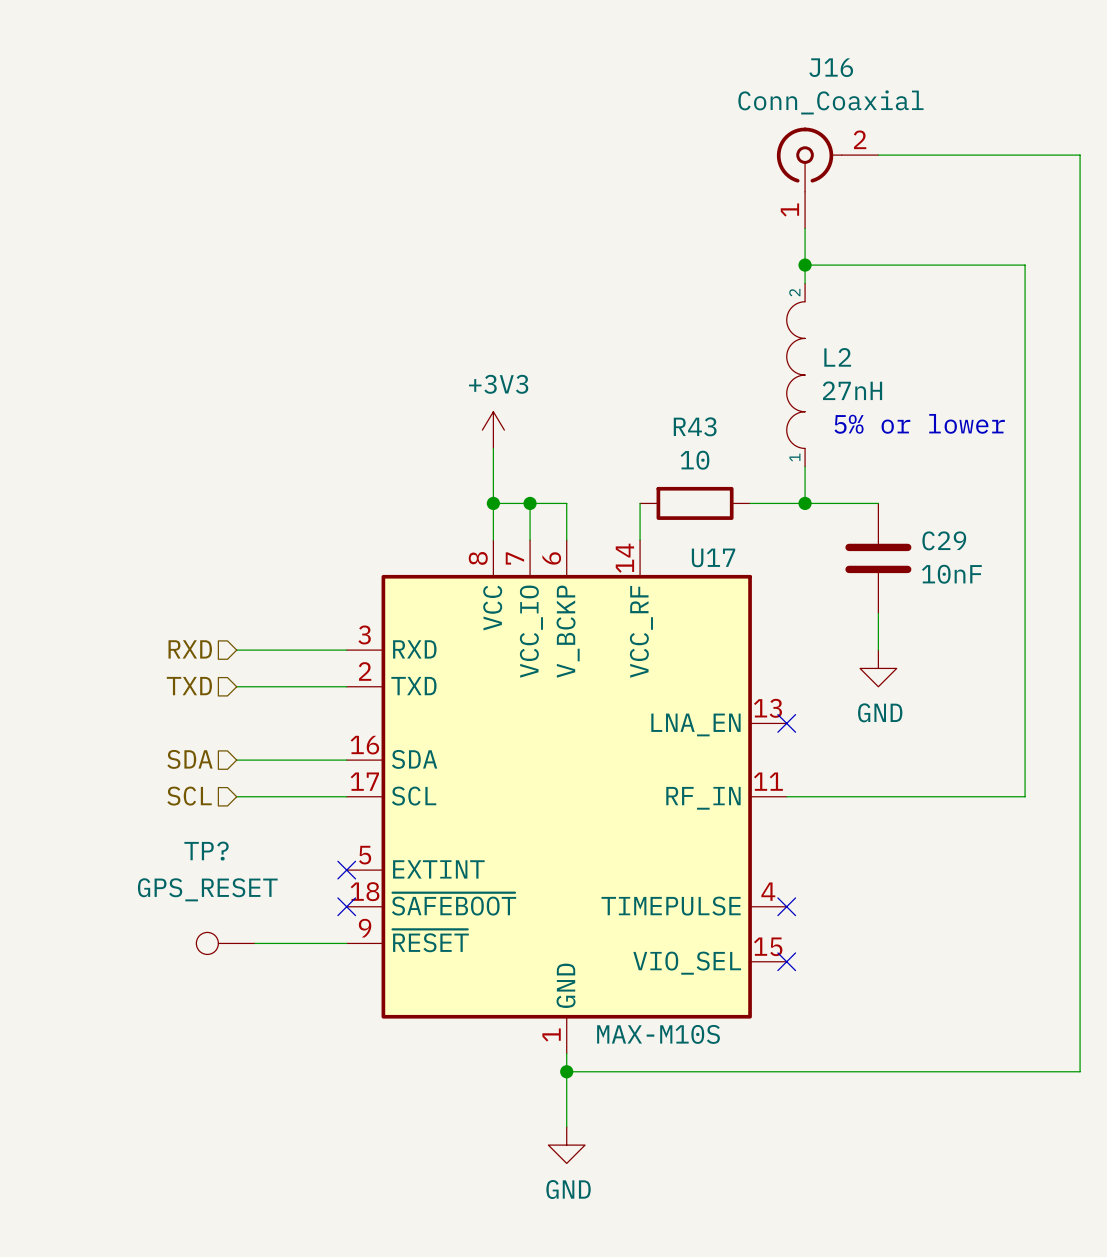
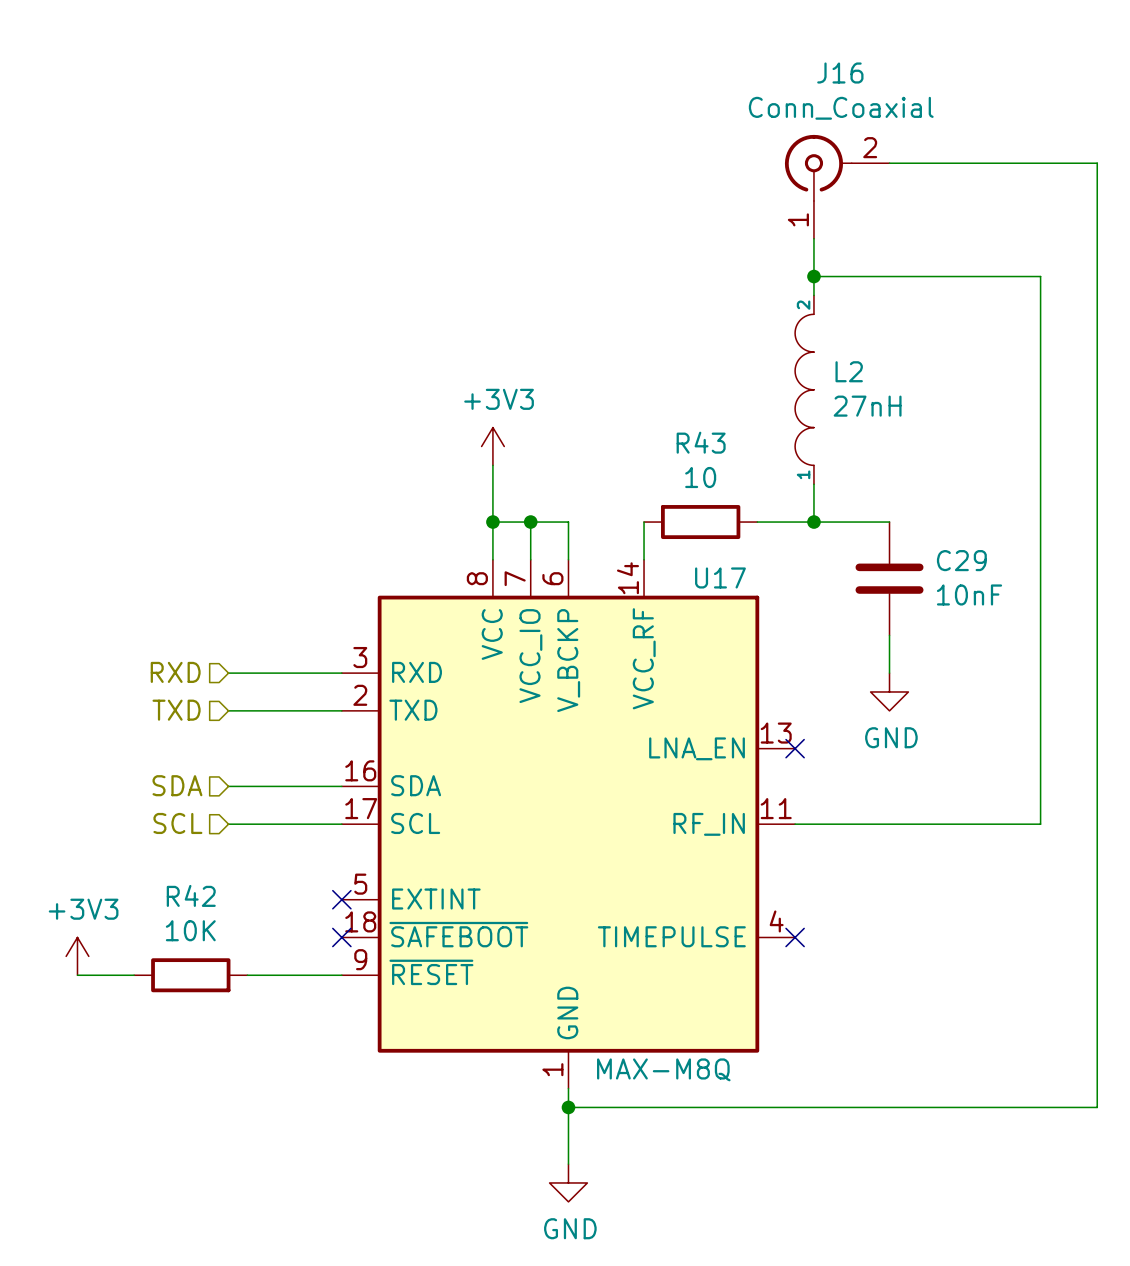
text: 5% or lower (919, 423) -> none
U17 symbol: [346, 540, 787, 1054] -> [341, 559, 796, 1089]
power symbol: none -> +3V3 (77, 956)
wire: none -> (77, 975) (134, 975)
R42: none -> 10K (190, 975)
TP?: GPS_RESET (225, 943) -> none
no-connect mark: (786, 961) -> none
U17 value: MAX-M10S (658, 1034) -> MAX-M8Q (663, 1069)

